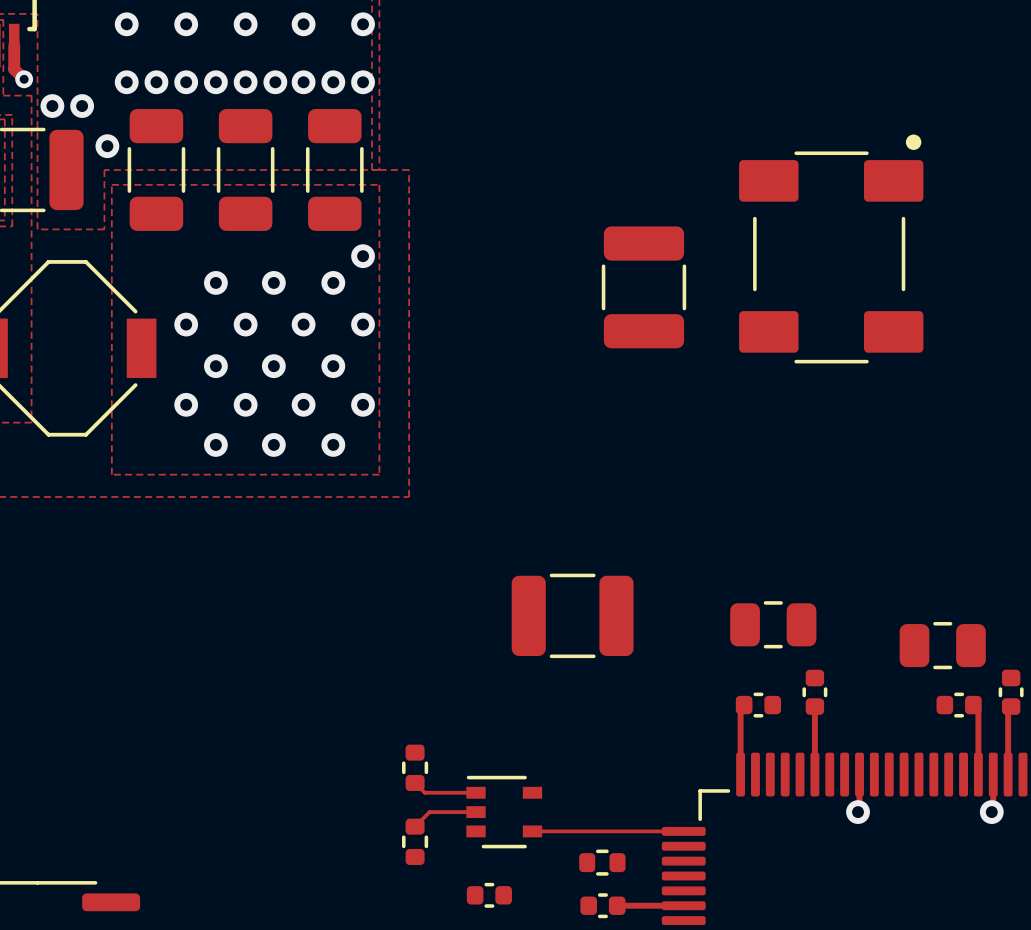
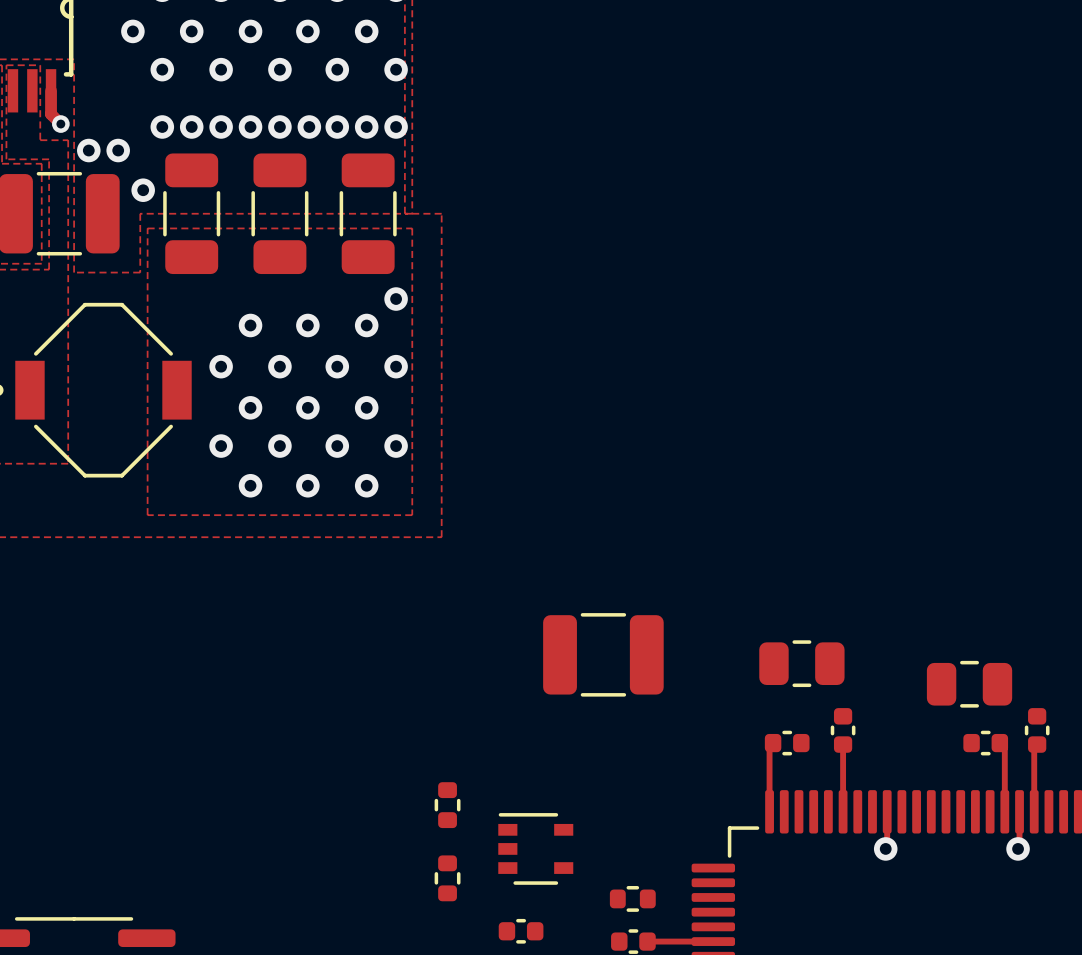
part: (831, 248) -> none
part: (643, 287) -> none
track: (415, 782) (424, 792) (476, 792) -> none
track: (476, 812) (429, 812) (415, 826) -> none
track: (532, 831) (683, 831) -> none

